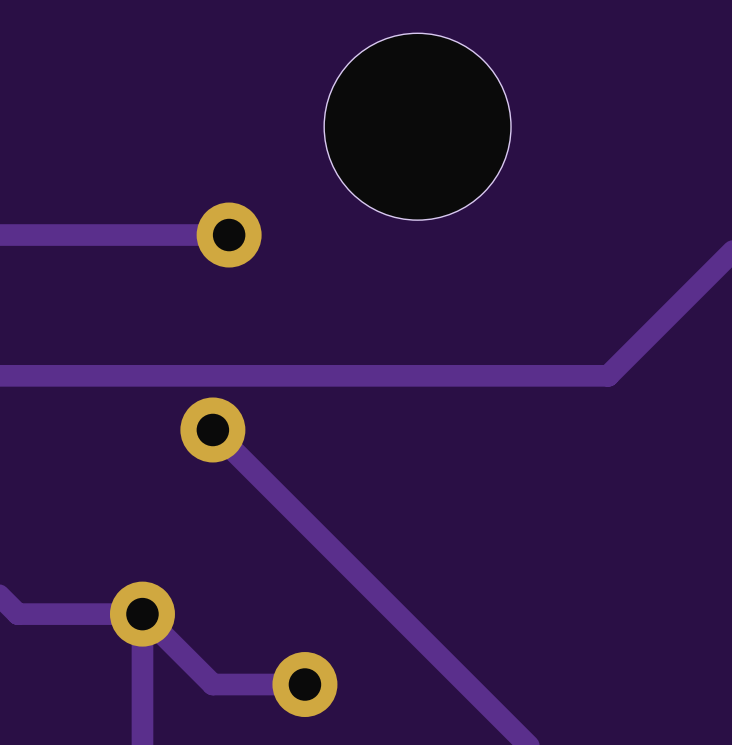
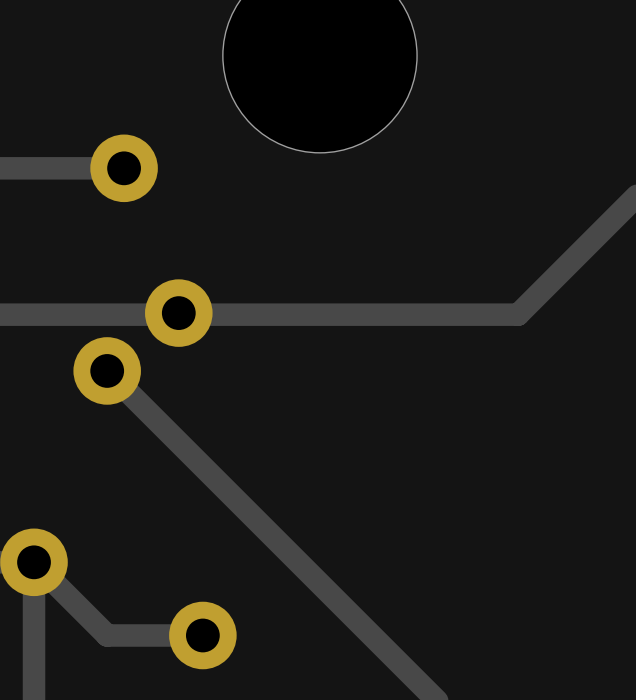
via: none -> (178, 313)

